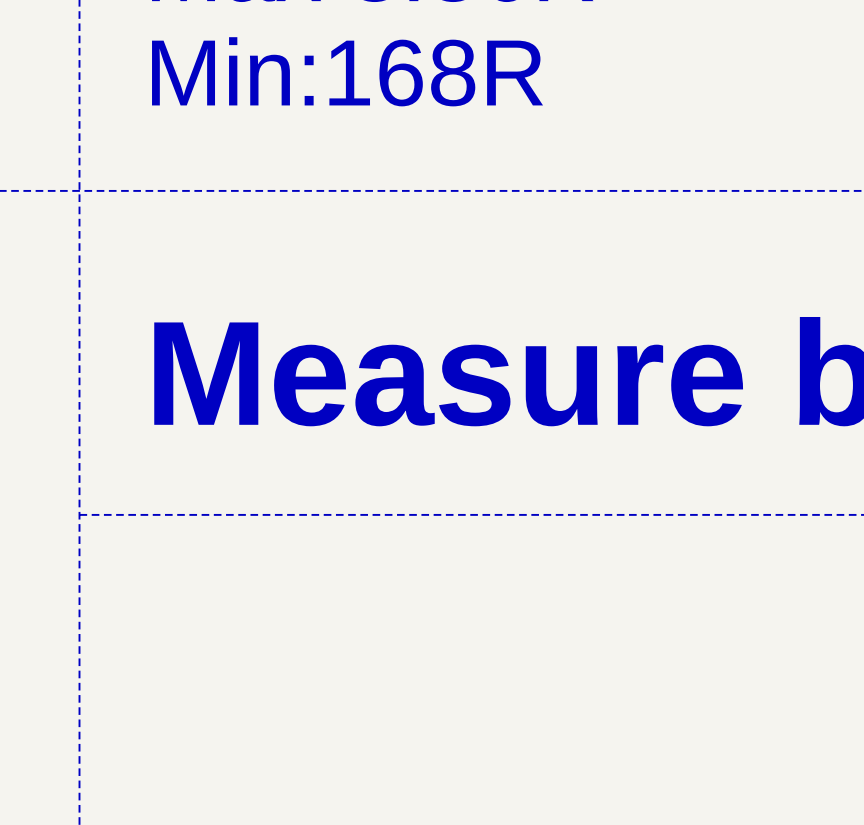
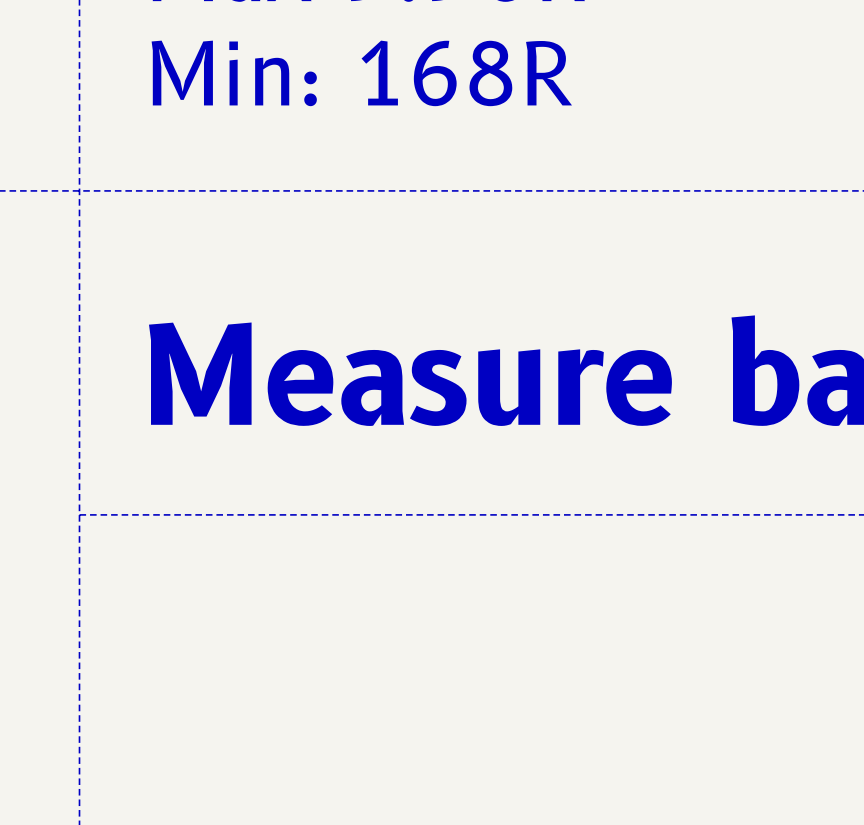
text: Min:168R (347, 71) -> Min: 168R (361, 73)

